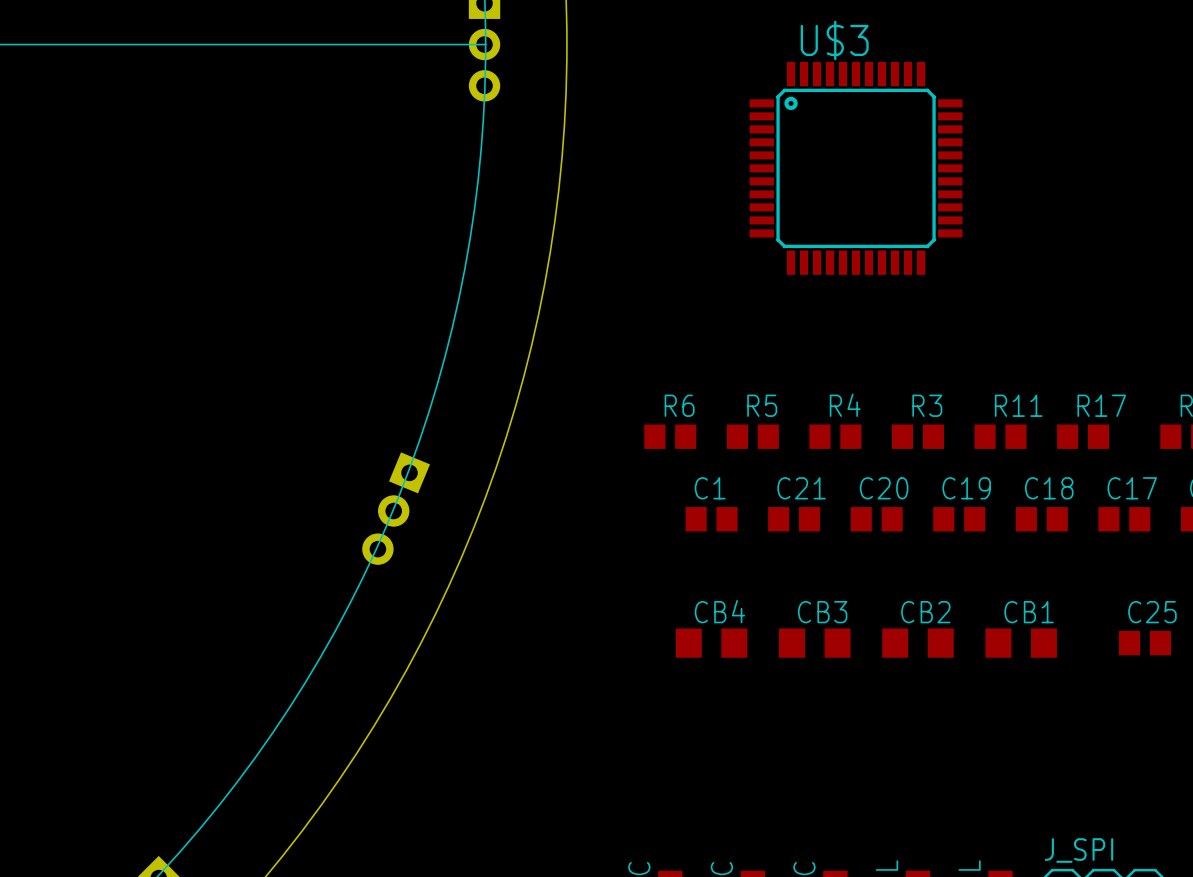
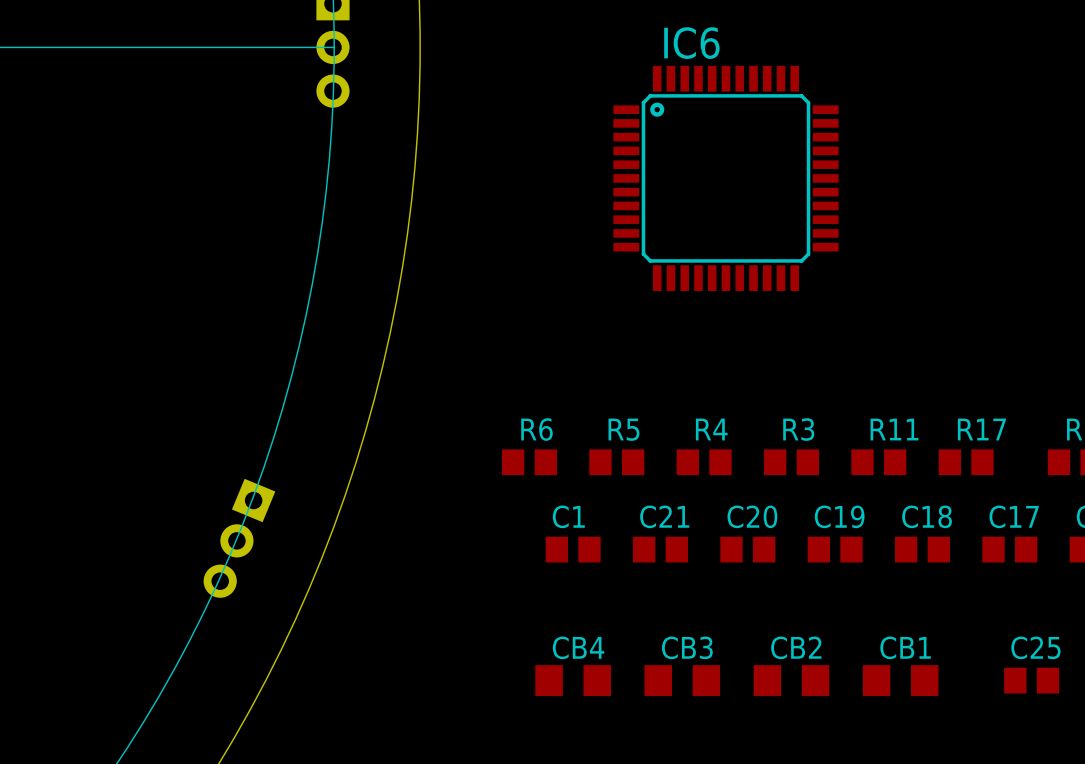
U$3 name: U$3 (834, 40) -> IC6 (691, 43)

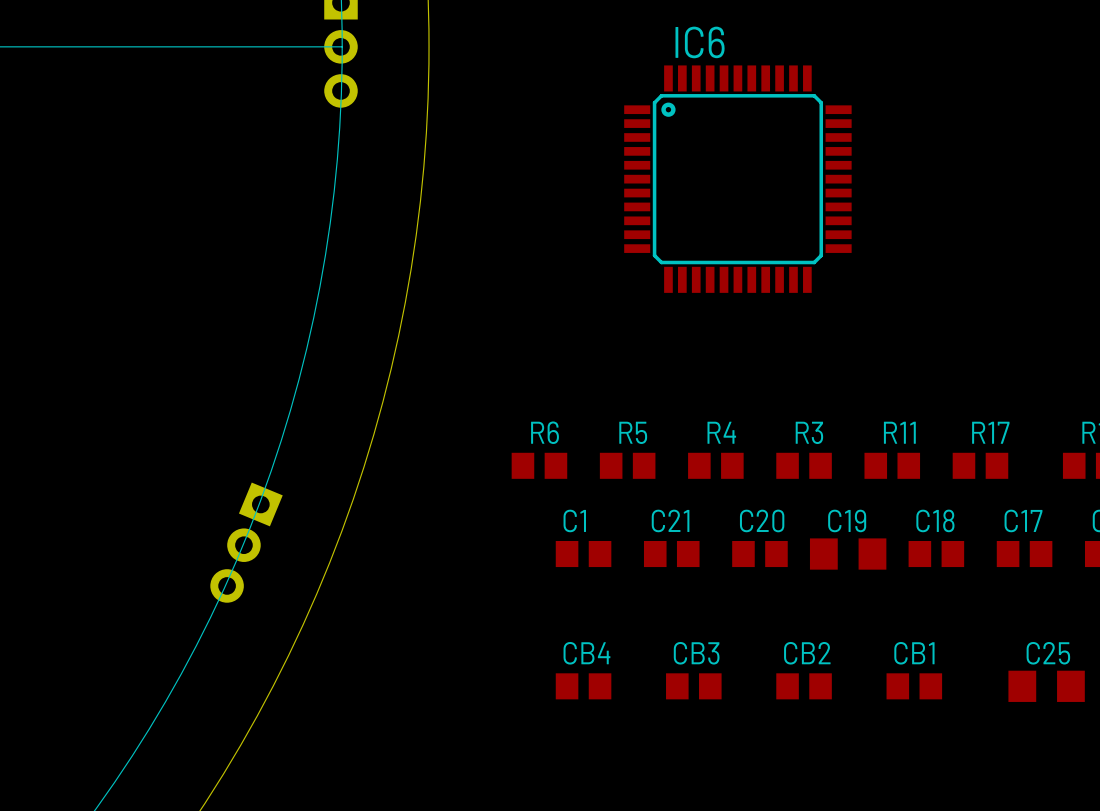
C19 footprint: [807, 536, 863, 563] -> [809, 538, 887, 570]
CB4 footprint: [535, 665, 611, 697] -> [555, 673, 612, 700]
CB3 footprint: [644, 665, 721, 697] -> [666, 673, 722, 700]
CB2 footprint: [753, 665, 830, 697] -> [776, 673, 832, 700]
CB1 footprint: [862, 665, 939, 697] -> [886, 673, 943, 700]
C25 footprint: [1004, 667, 1060, 694] -> [1008, 670, 1085, 702]

